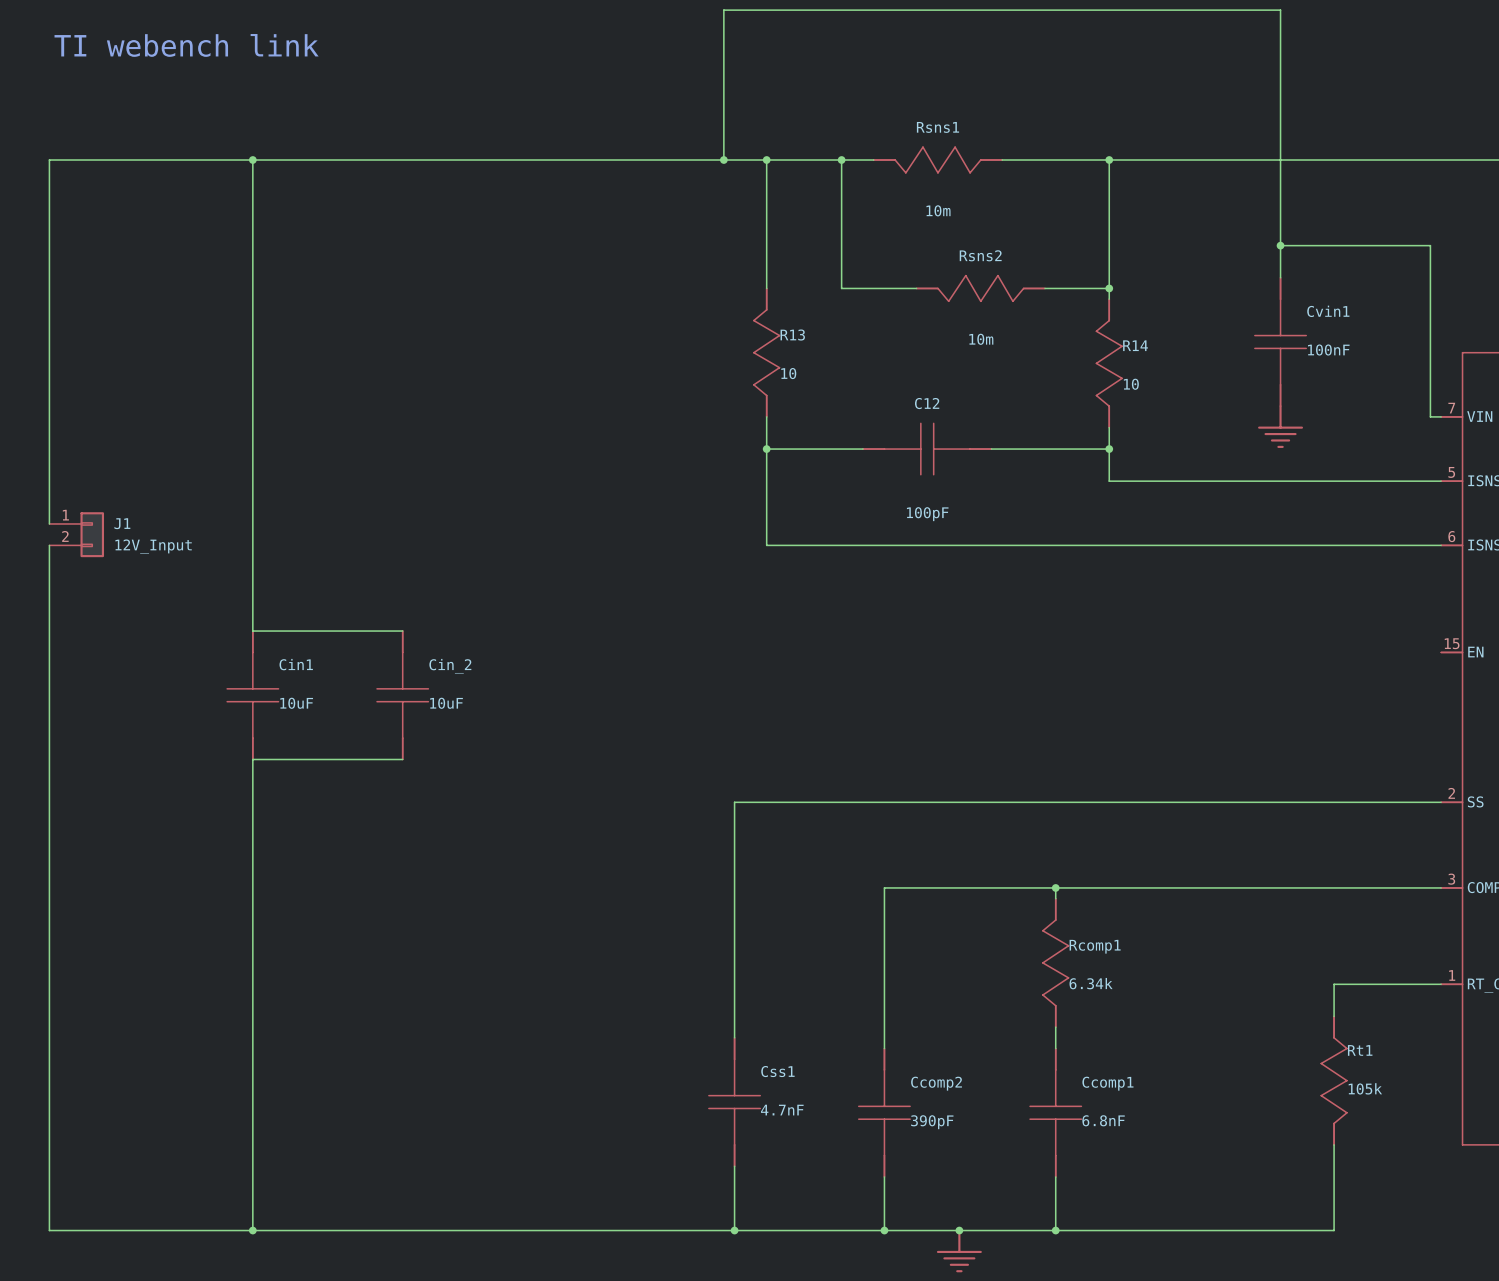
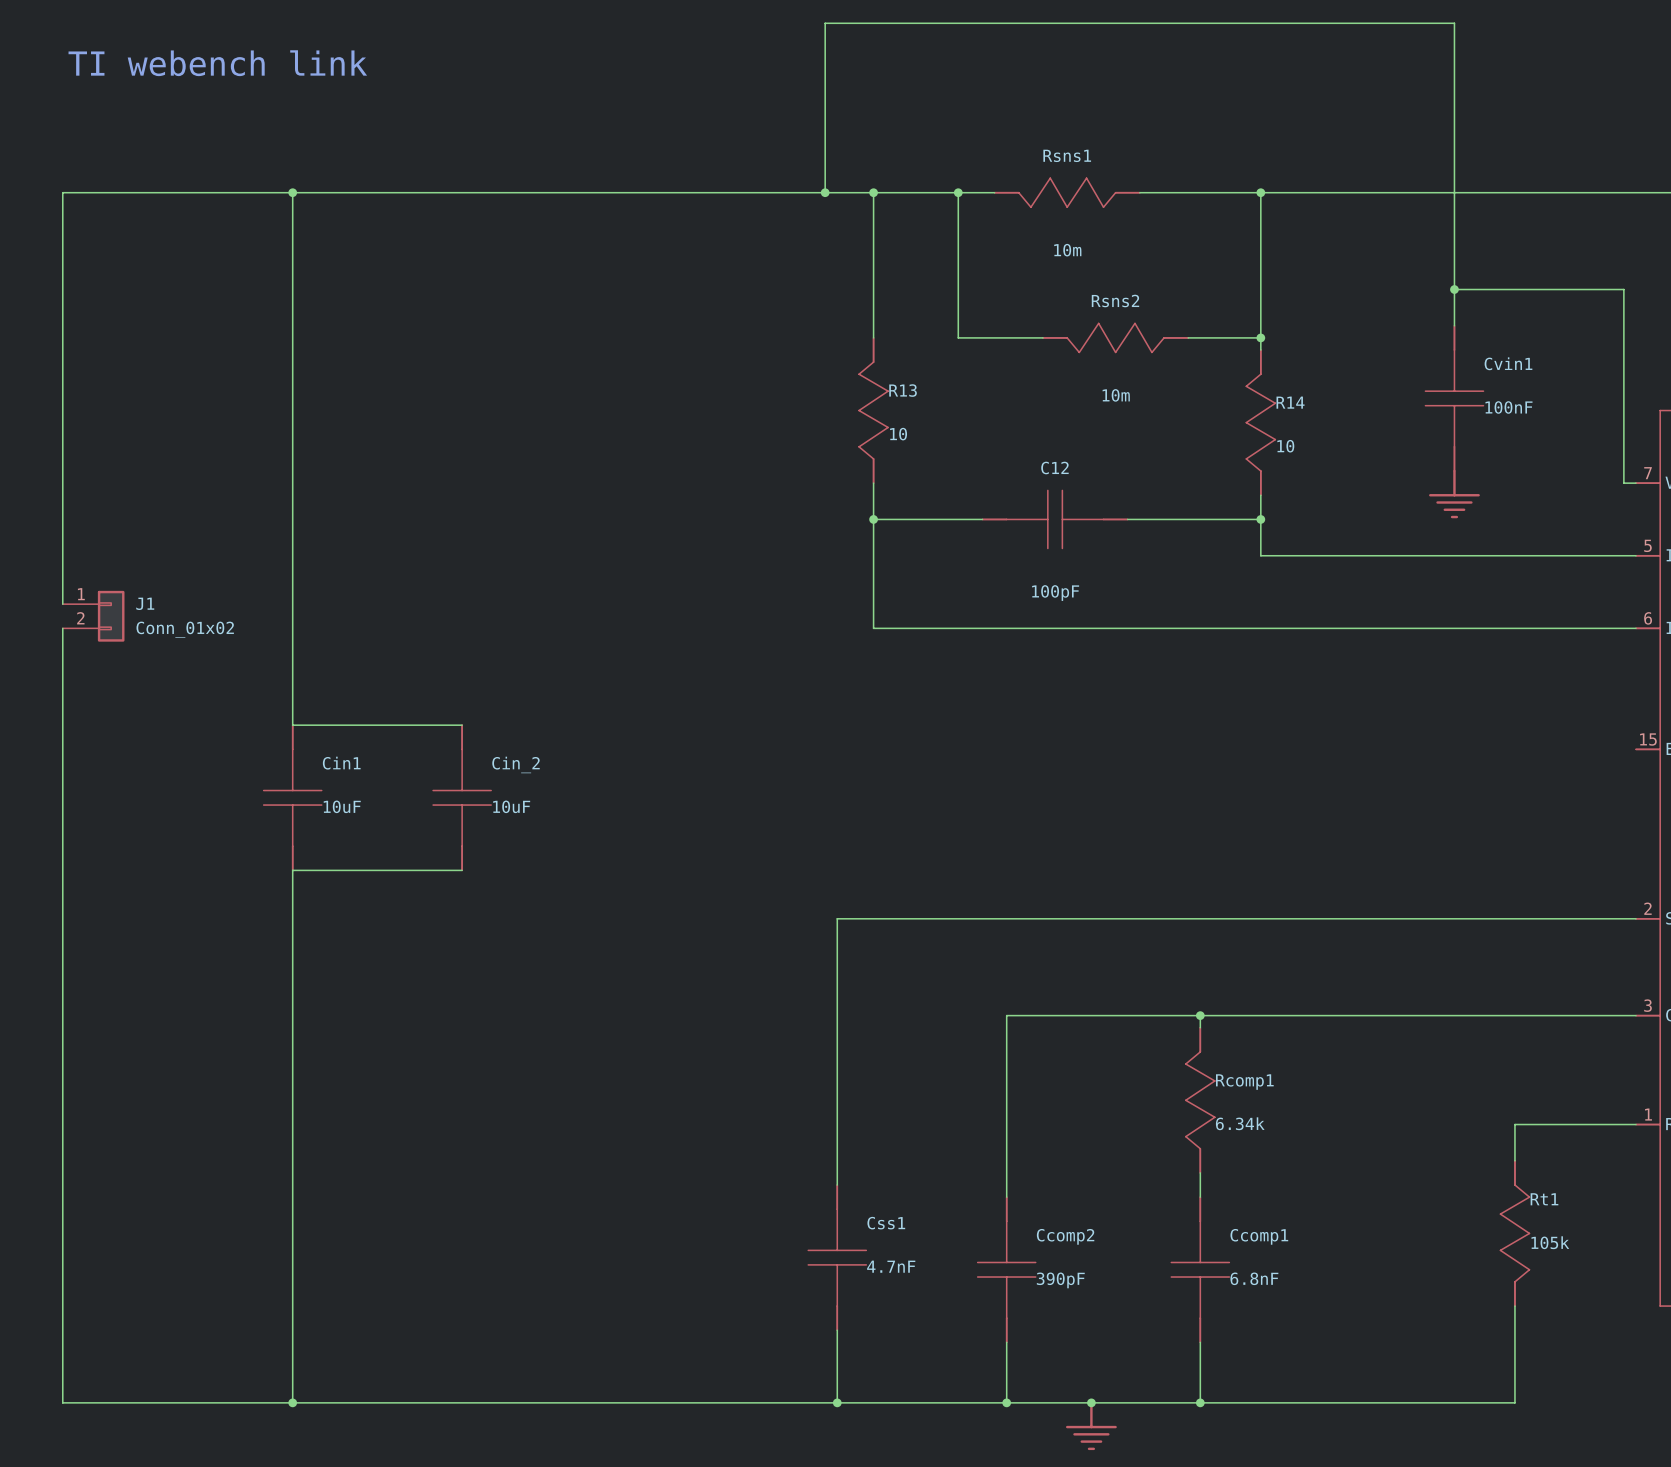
J1 value: 12V_Input (153, 546) -> Conn_01x02 (185, 629)

